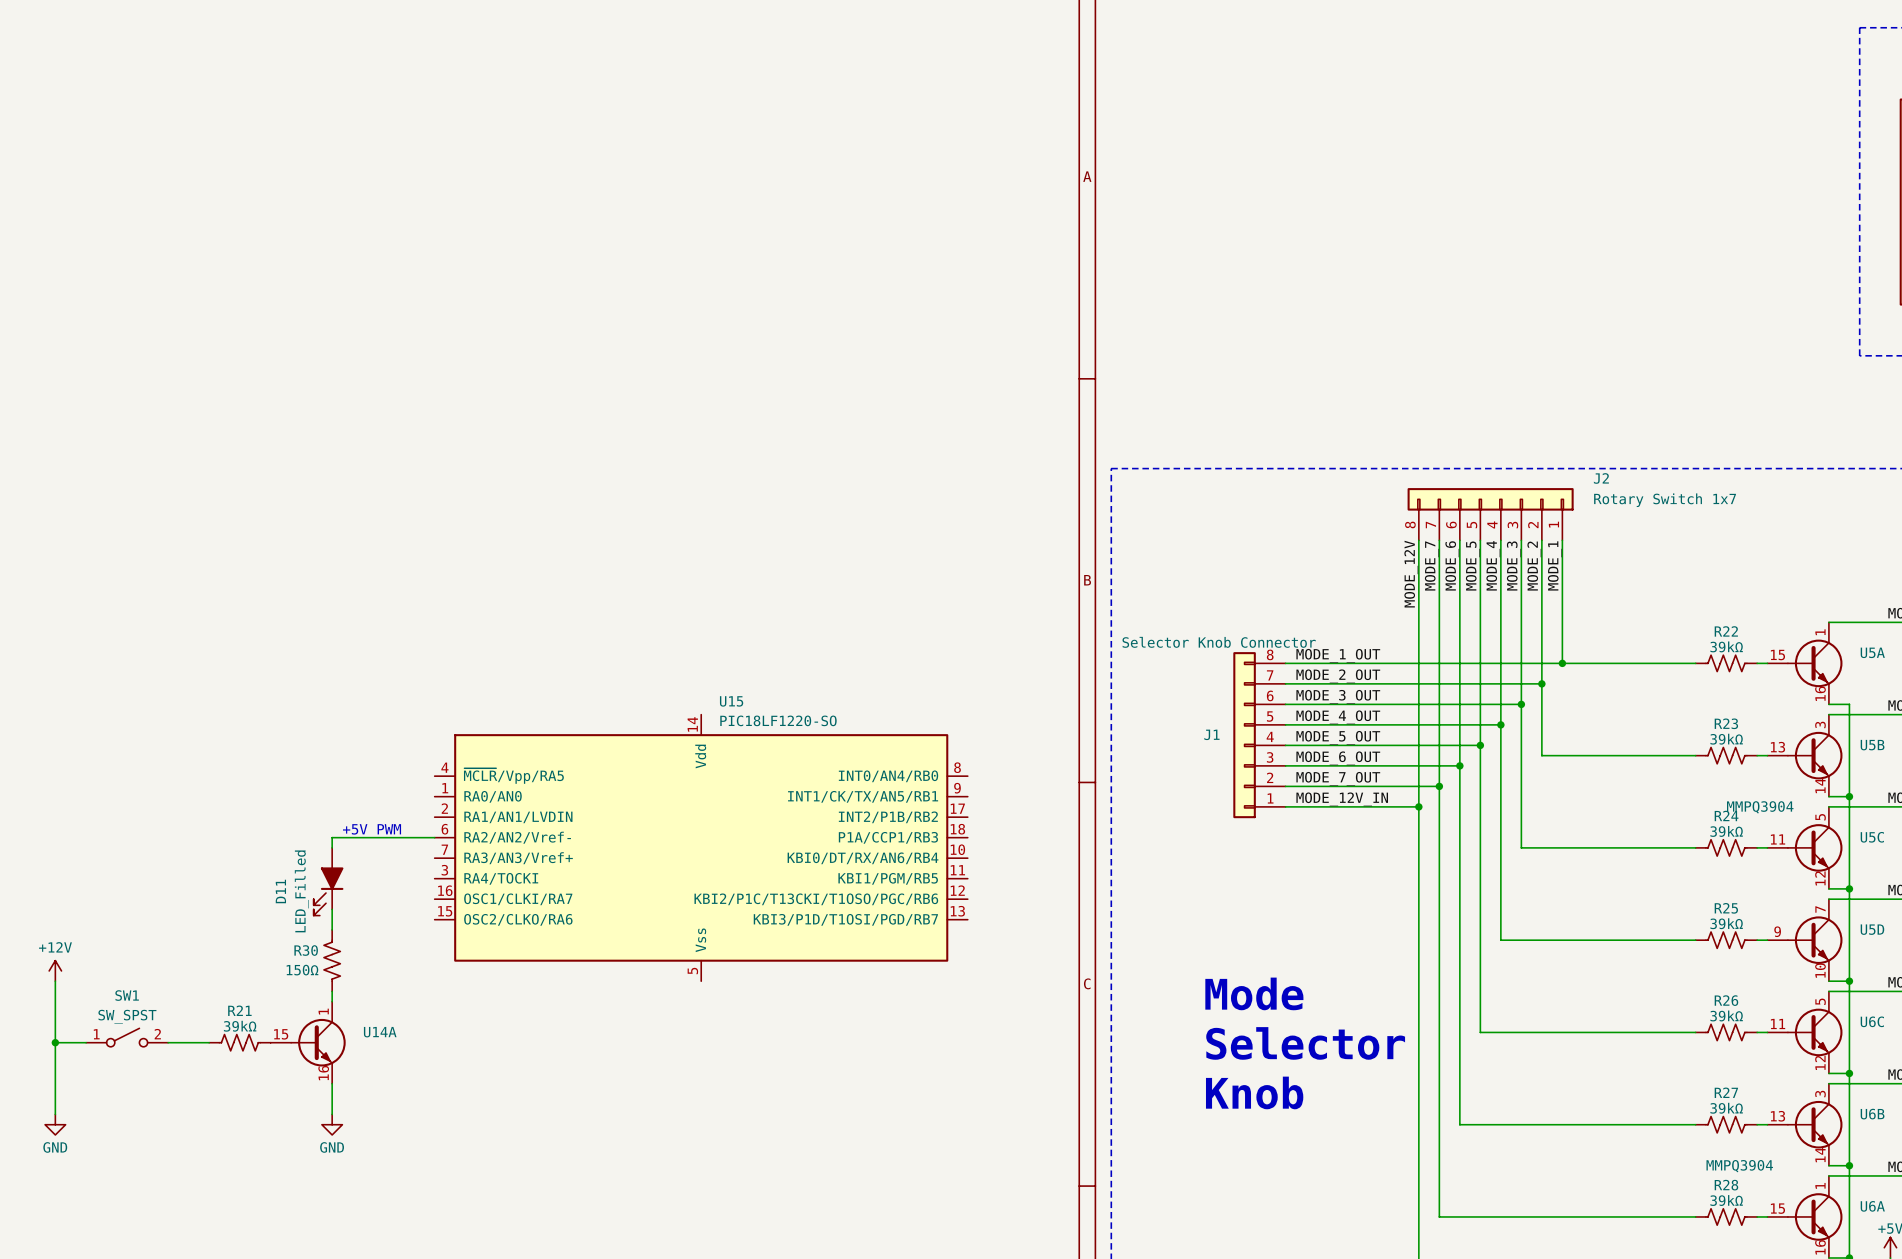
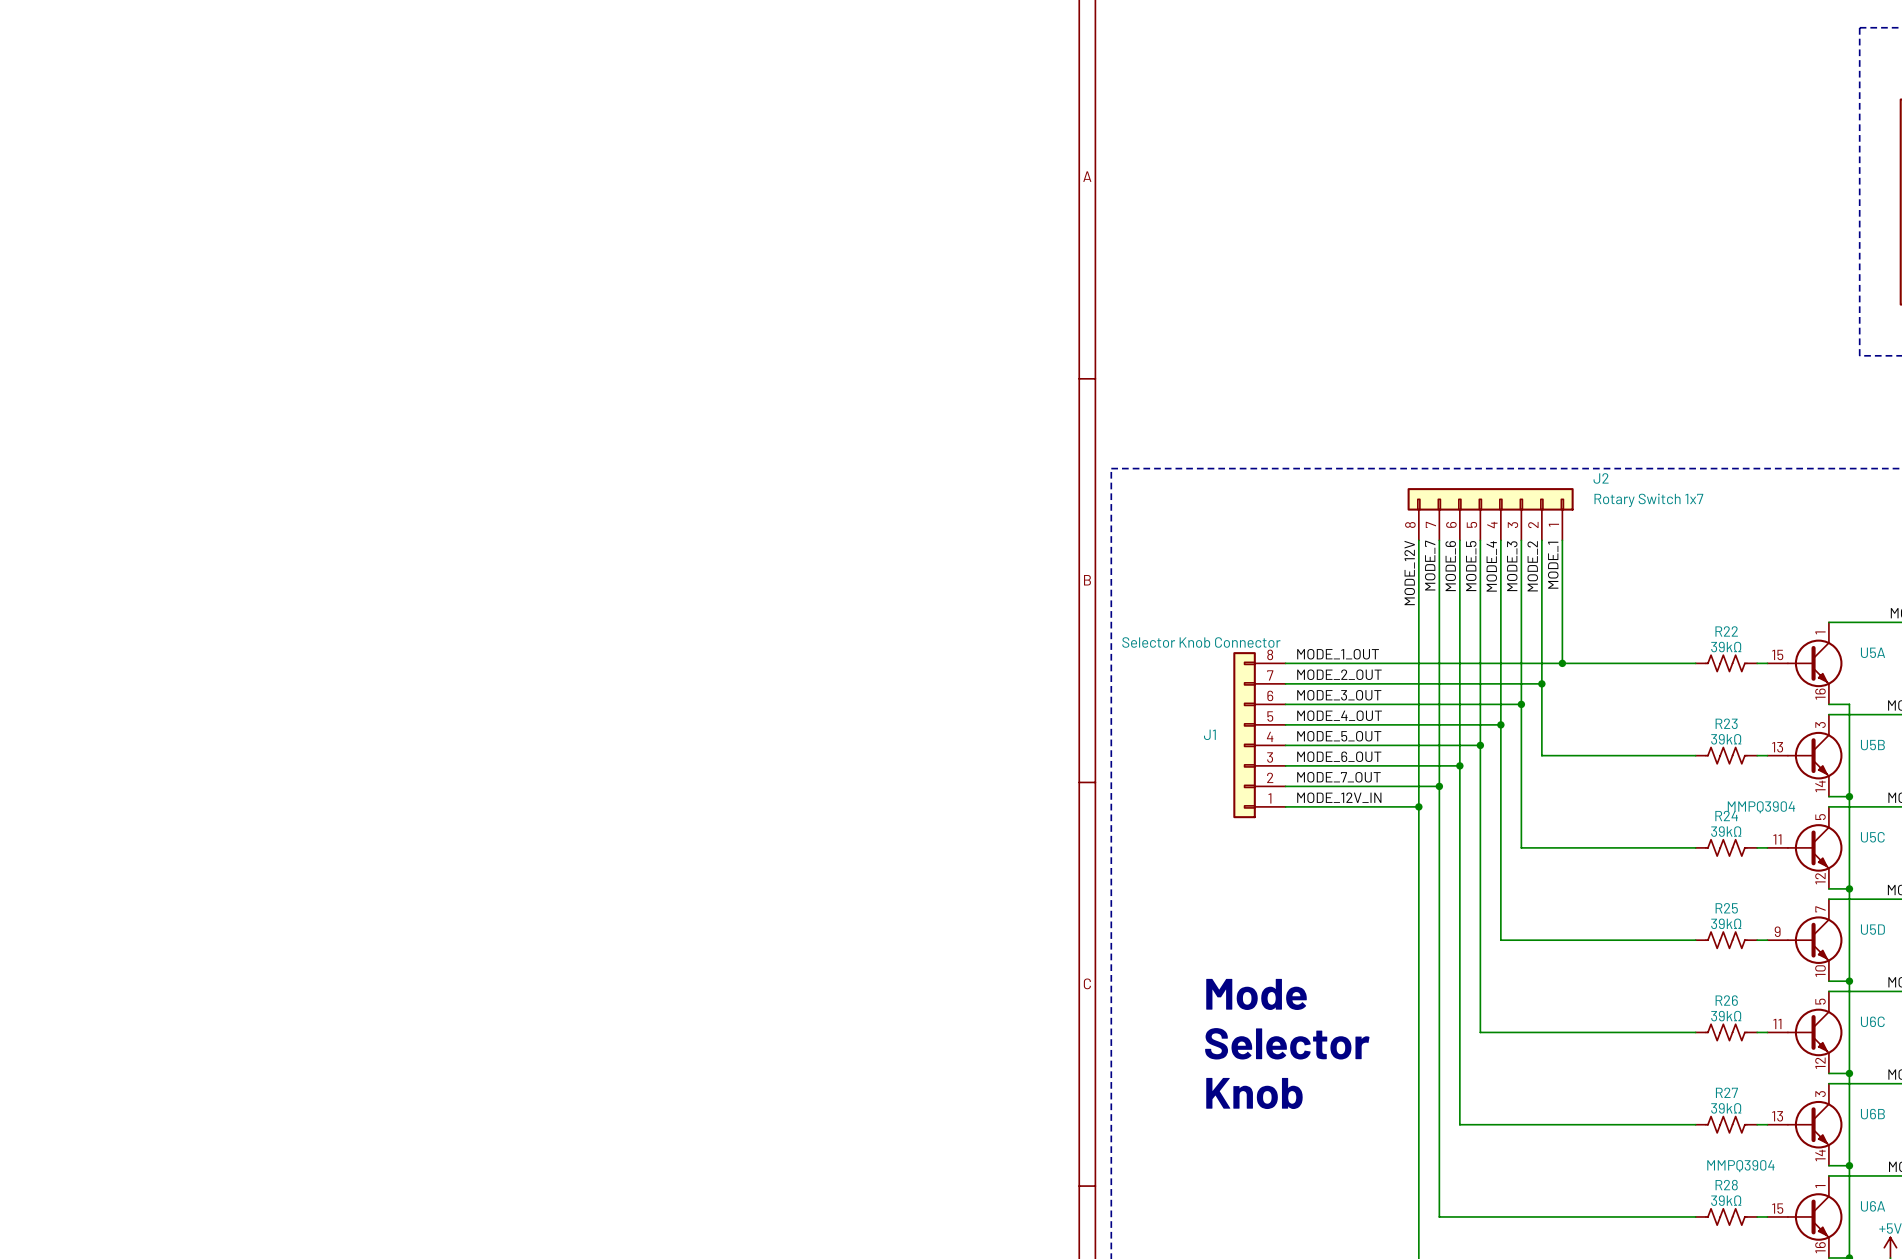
text: +5V PWM (372, 829) -> none
wire: (434, 837) (332, 837) (332, 847) -> none
U15: PIC18LF1220-SO (701, 847) -> none
D11: LED_Filled (328, 881) -> none
wire: (332, 909) (332, 929) -> none
R30: 150Ω (332, 960) -> none
power symbol: +12V (55, 970) -> none
wire: (55, 981) (55, 1114) -> none
wire: (332, 991) (332, 1001) -> none
SW1: SW_SPST (127, 1037) -> none
wire: (55, 1042) (86, 1042) -> none
junction: (55, 1042) -> none
wire: (168, 1042) (209, 1042) -> none
R21: 39kΩ (239, 1042) -> none
U14A: (308, 1042) -> none
wire: (332, 1083) (332, 1114) -> none
power symbol: GND (55, 1124) -> none
power symbol: GND (332, 1124) -> none

